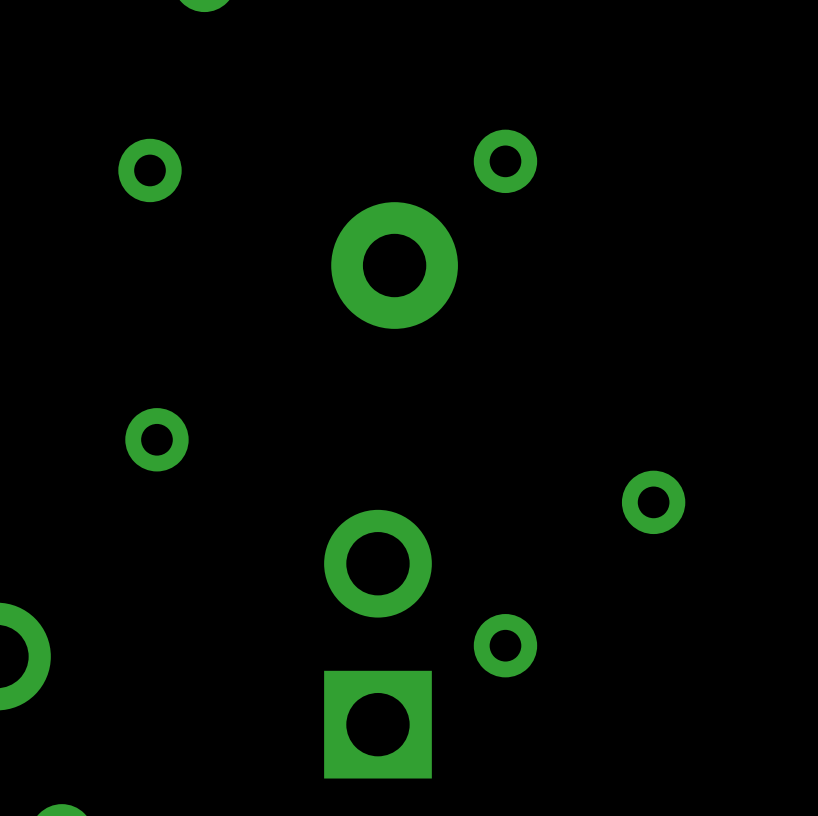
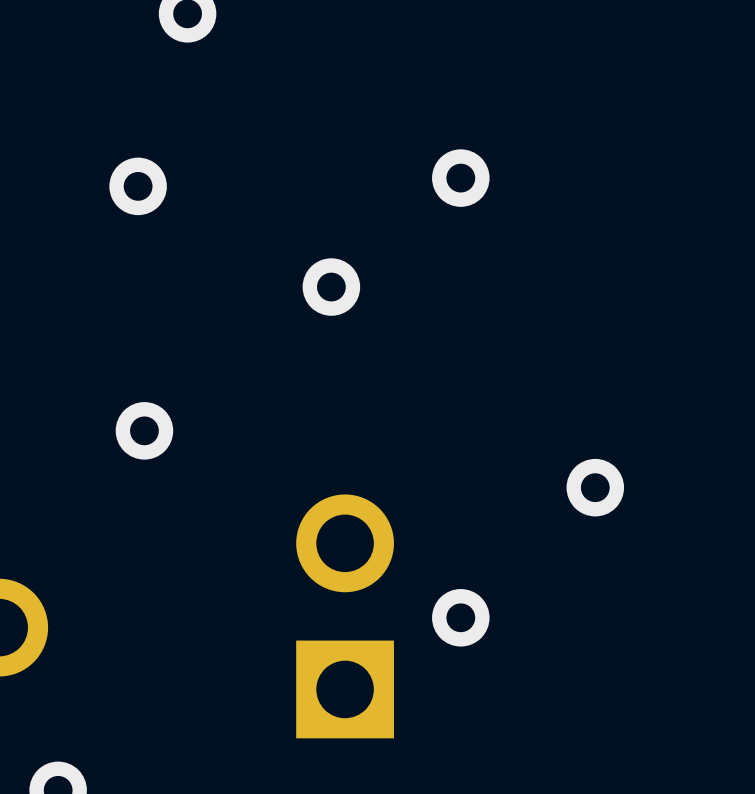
part: (394, 265) -> none
via: none -> (331, 287)

